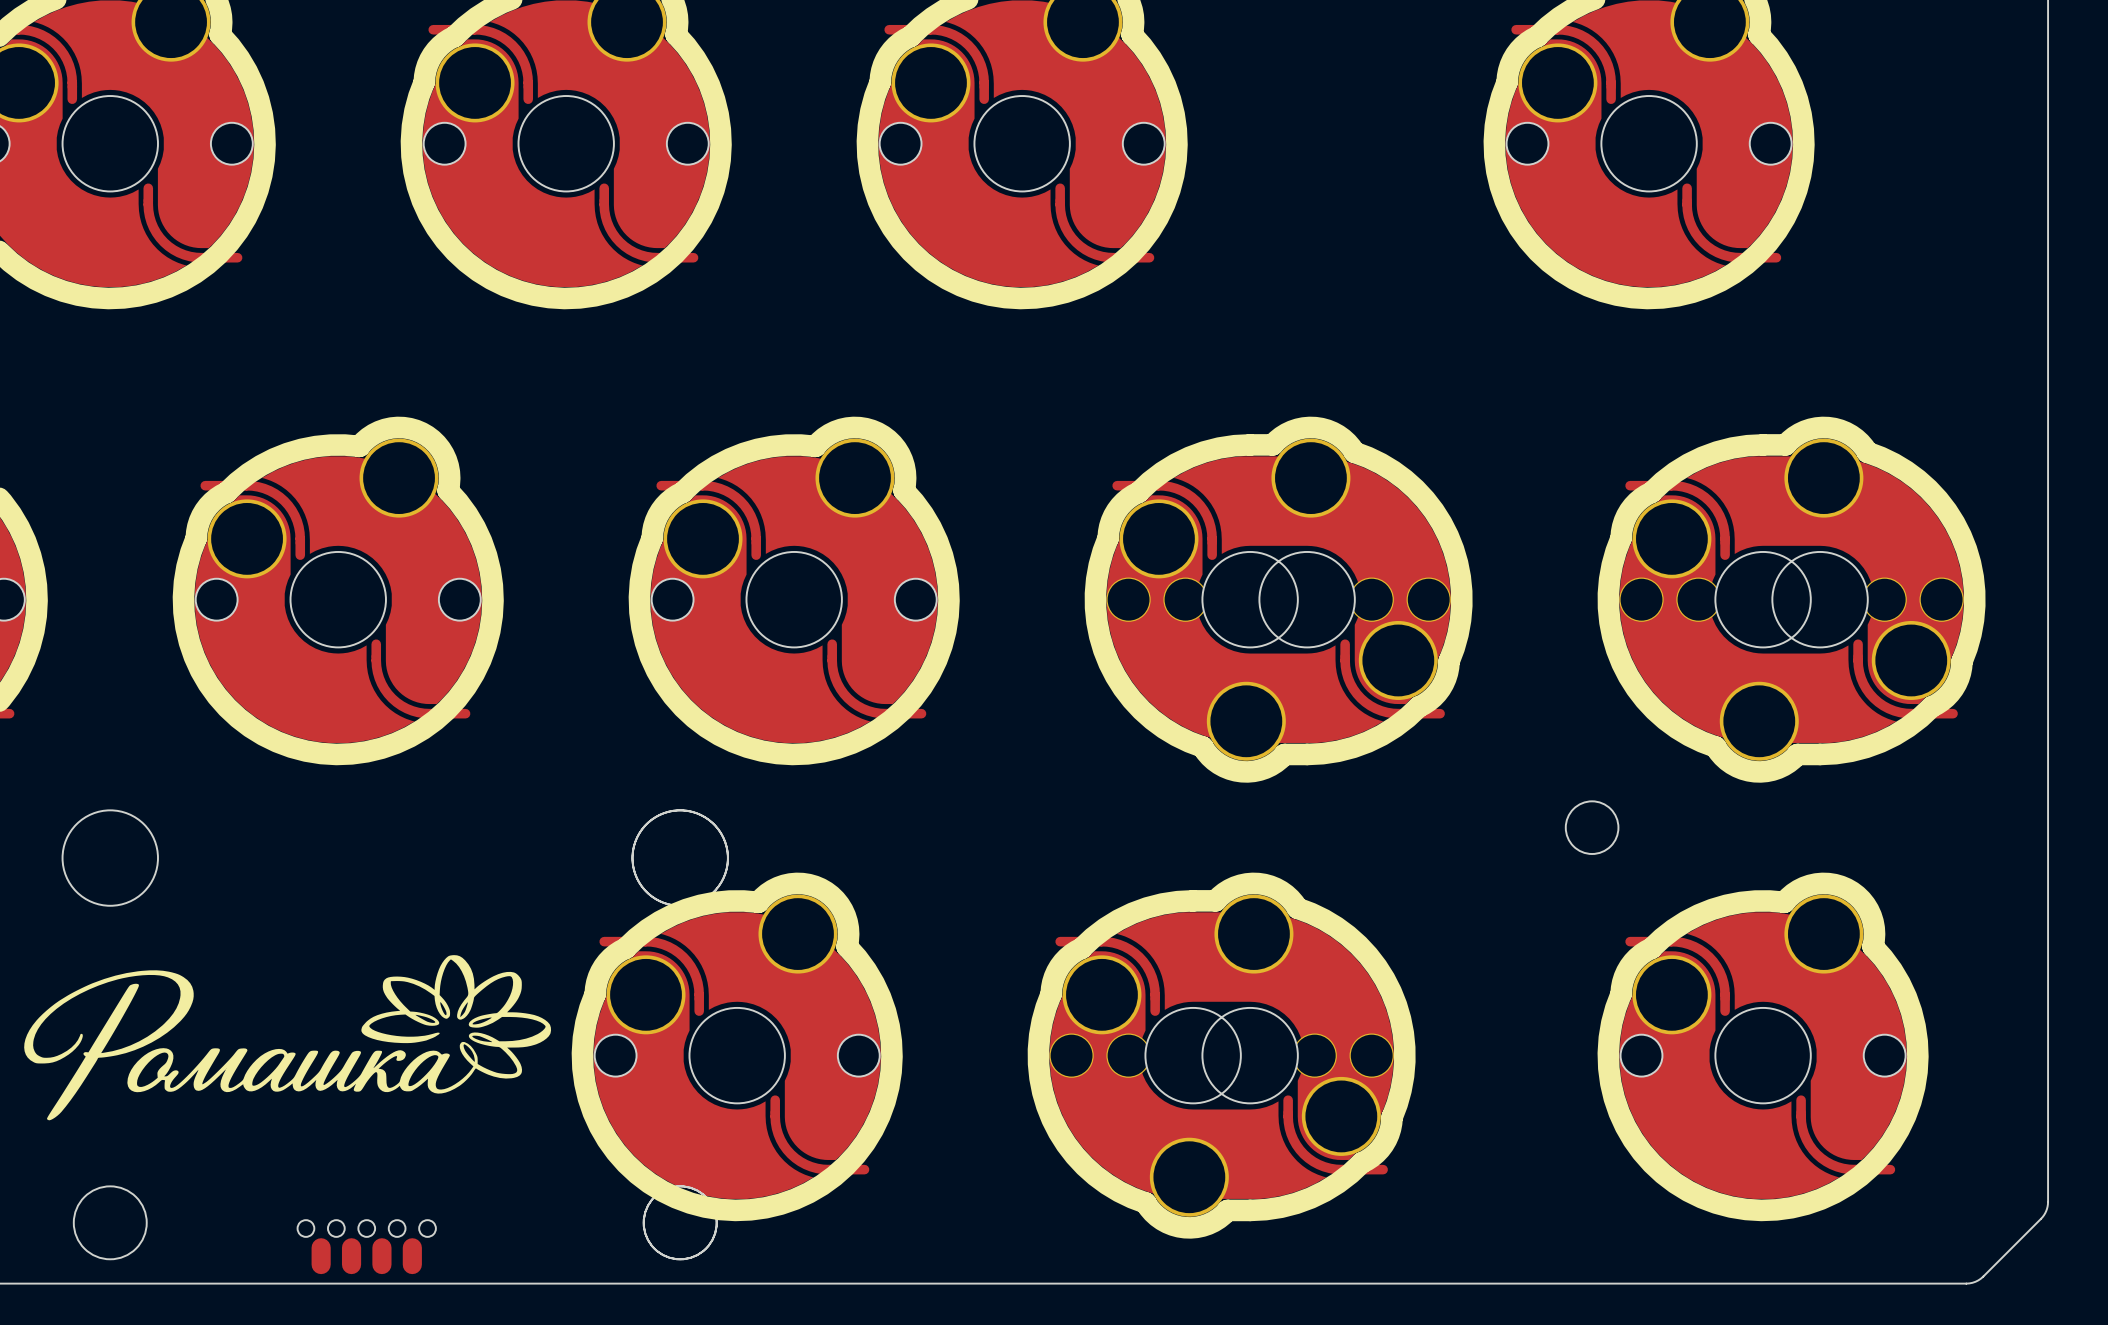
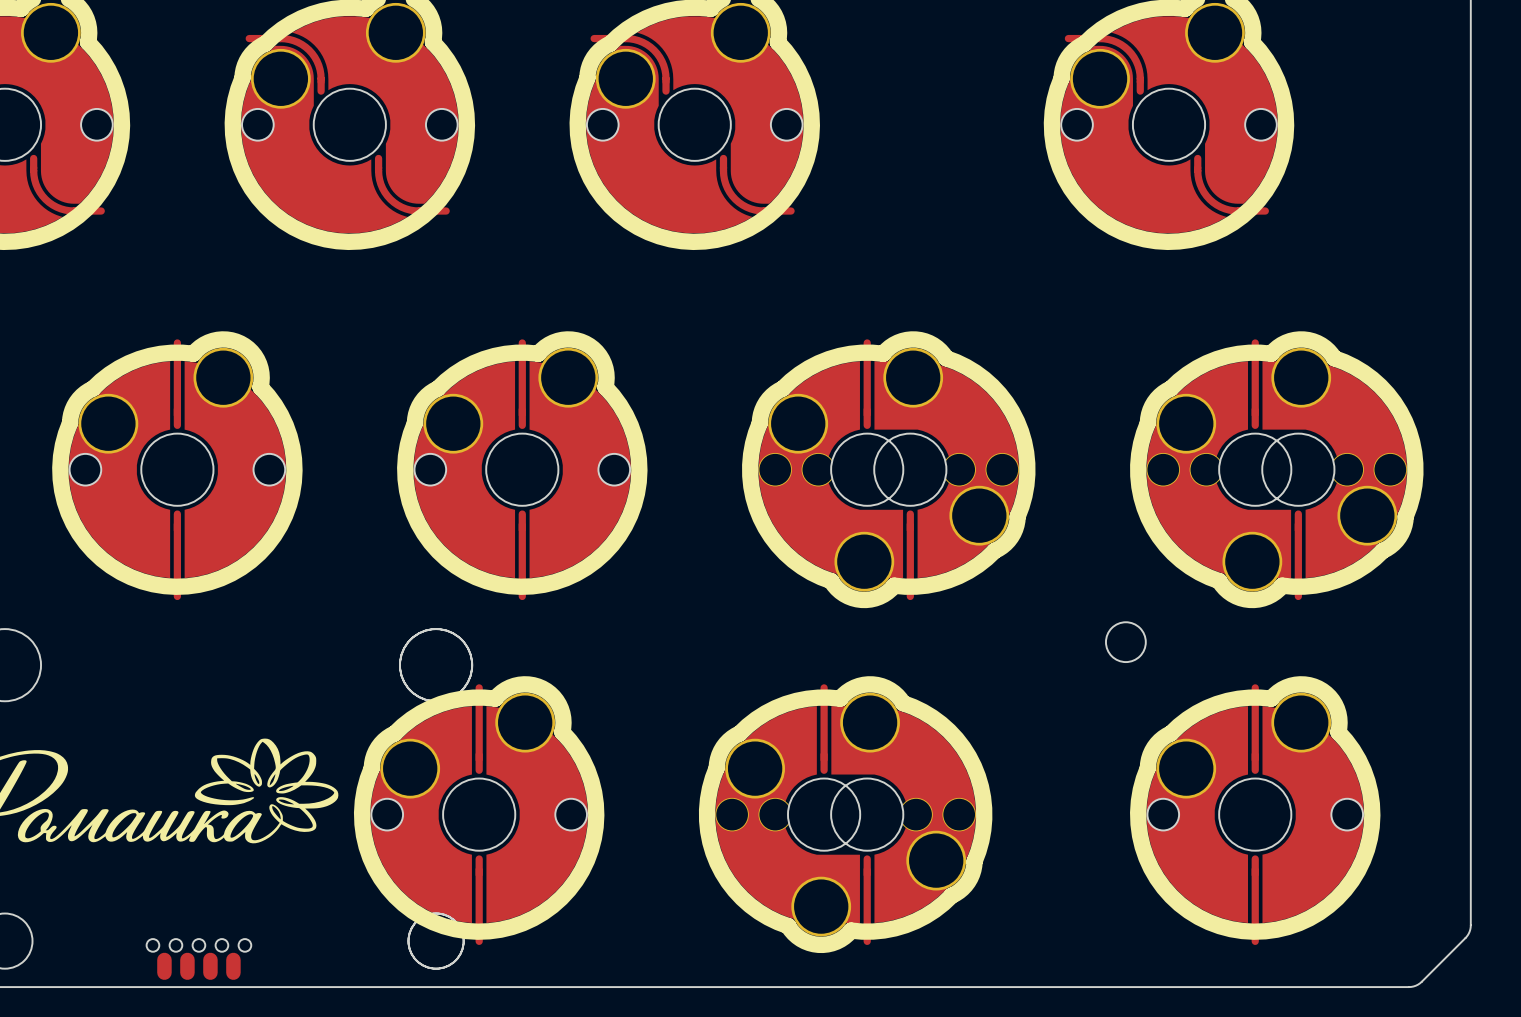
part footprint: [172, 416, 504, 766] -> [52, 331, 303, 601]
part footprint: [628, 416, 960, 766] -> [397, 331, 648, 601]
part footprint: [1084, 416, 1473, 783] -> [742, 331, 1036, 609]
part footprint: [1597, 416, 1986, 783] -> [1130, 331, 1424, 609]
part footprint: [571, 872, 903, 1222] -> [353, 676, 605, 945]
part footprint: [1027, 872, 1416, 1239] -> [698, 676, 993, 954]
part footprint: [1597, 872, 1929, 1222] -> [1130, 676, 1381, 945]

